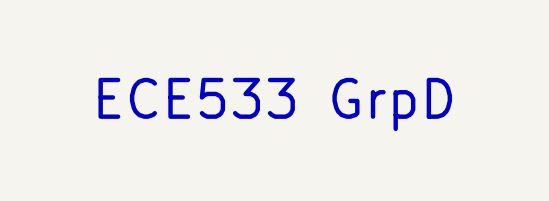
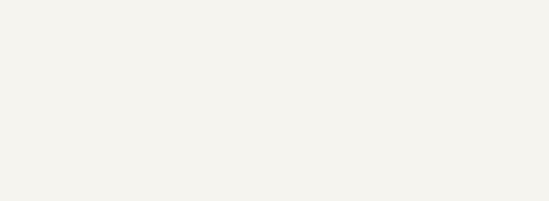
text: ECE533 GrpD (275, 104) -> none

